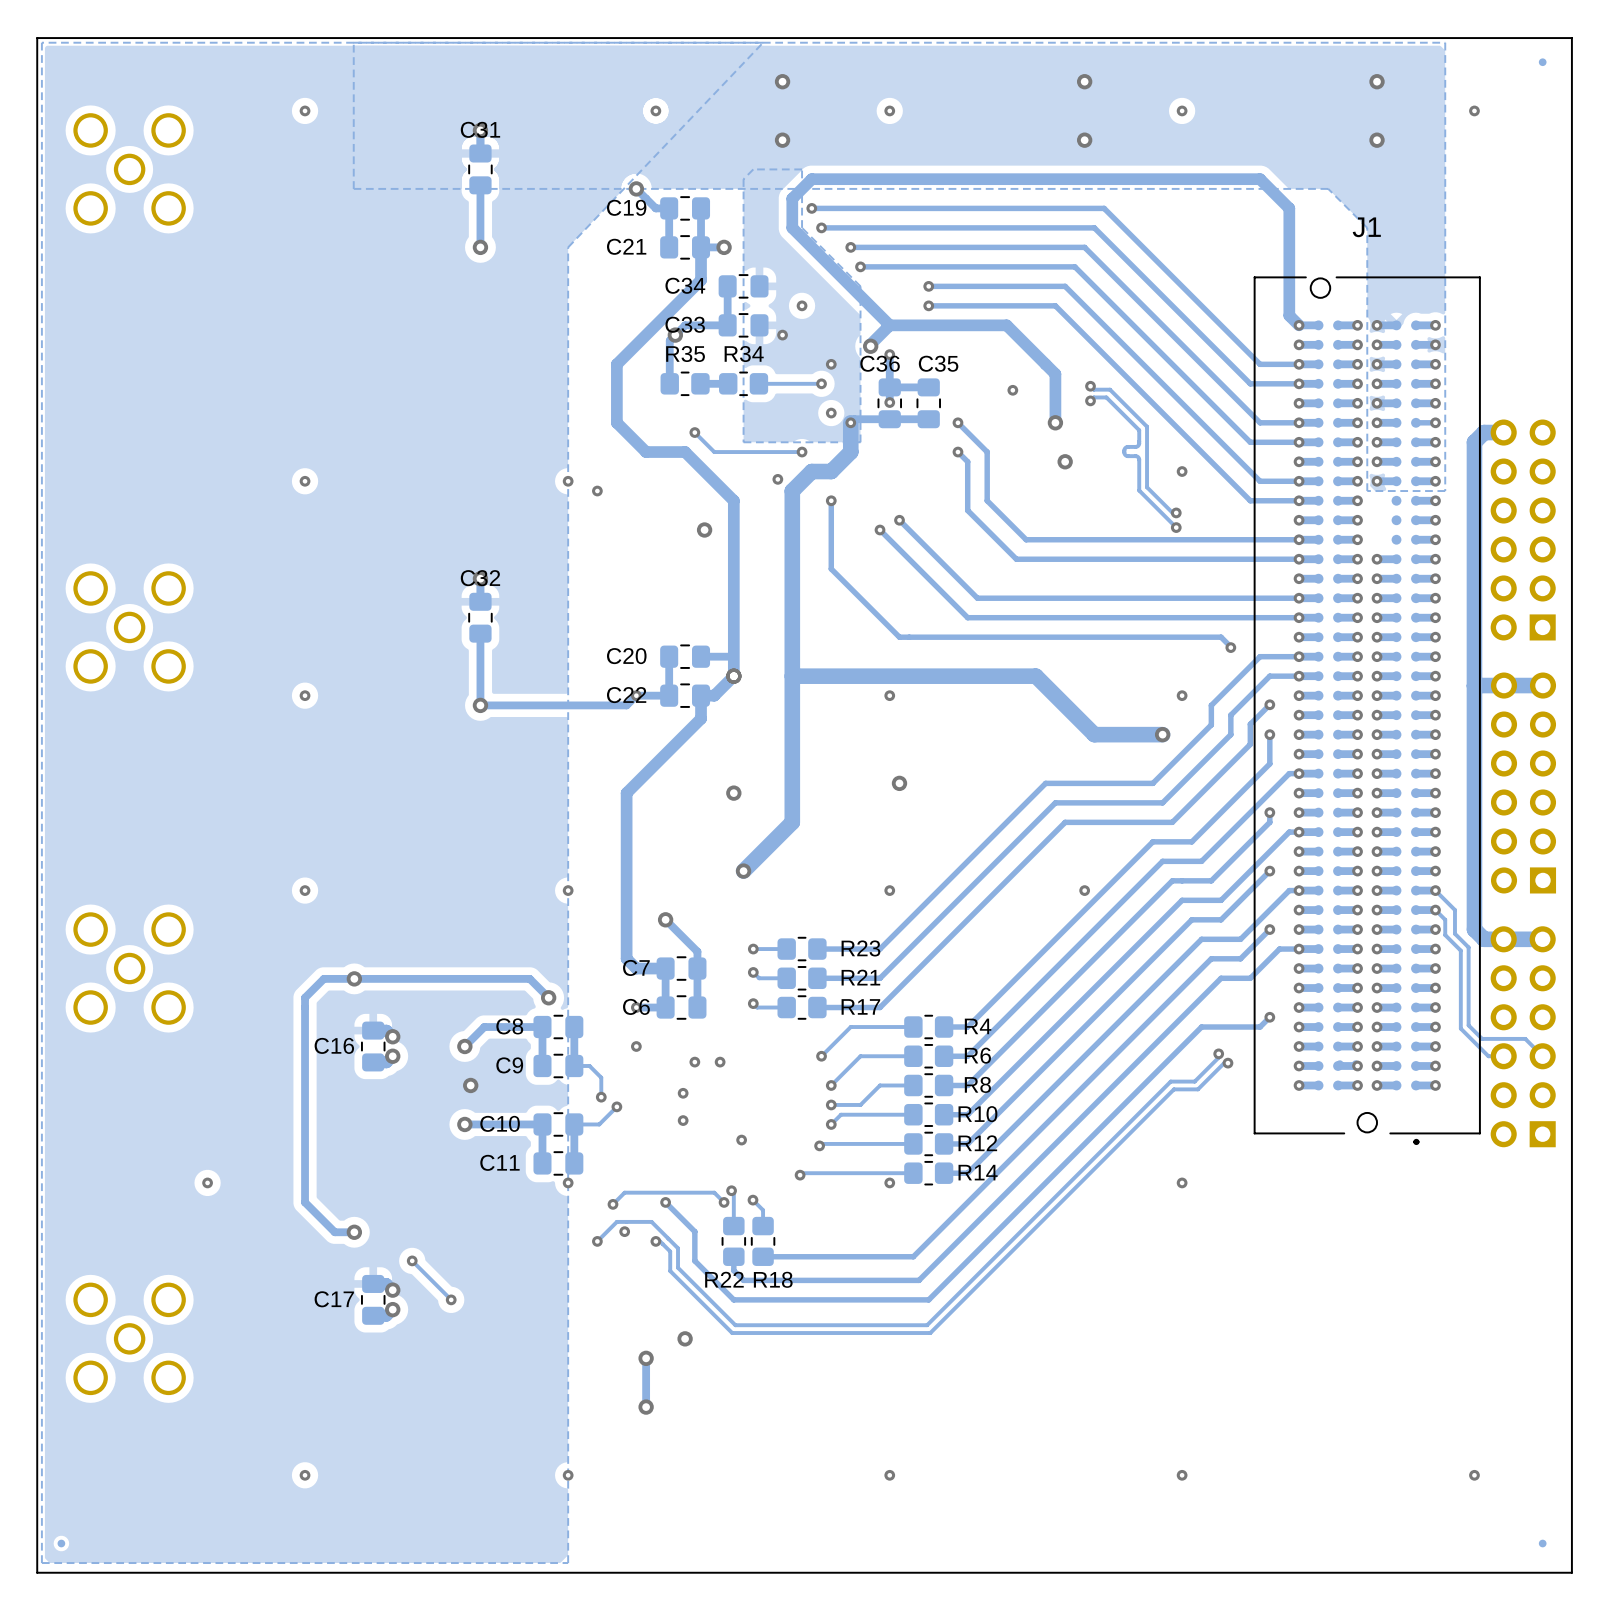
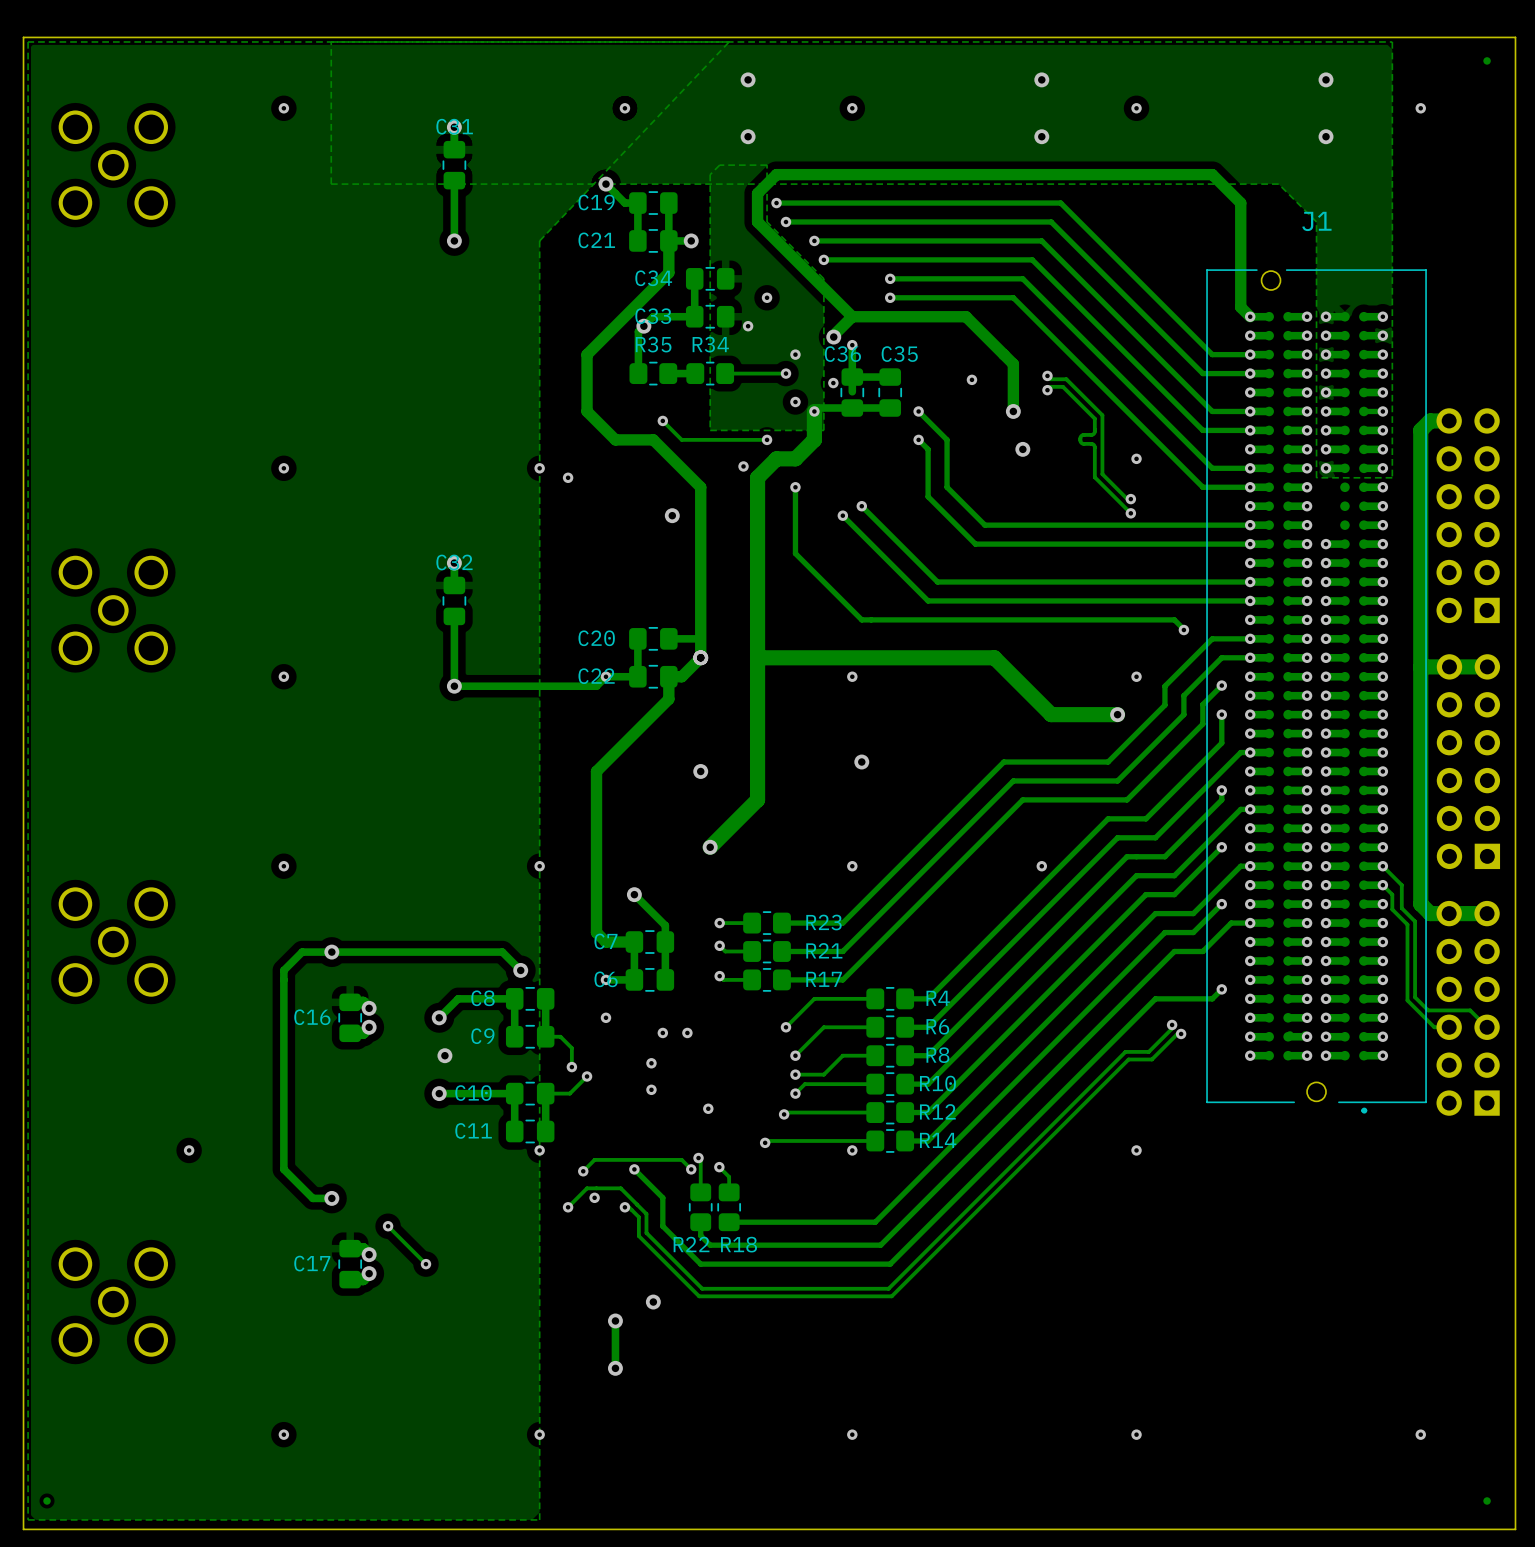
via position: (889, 402) -> (833, 383)

